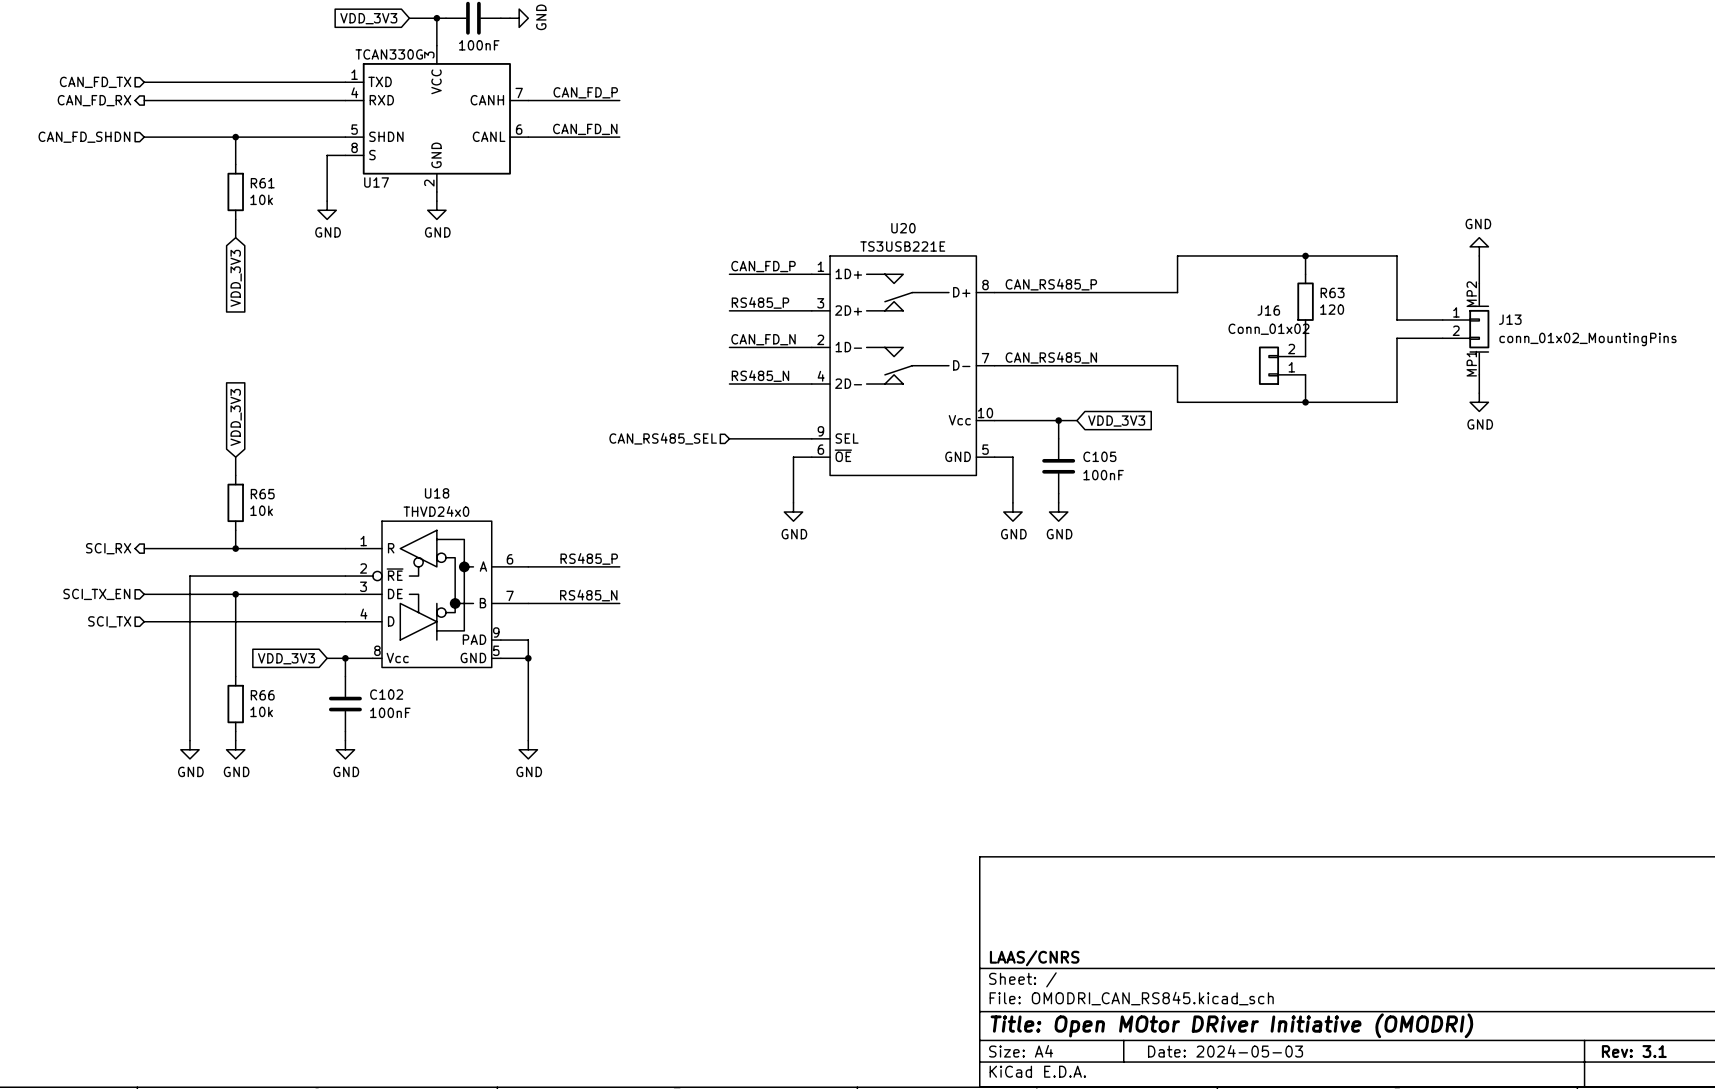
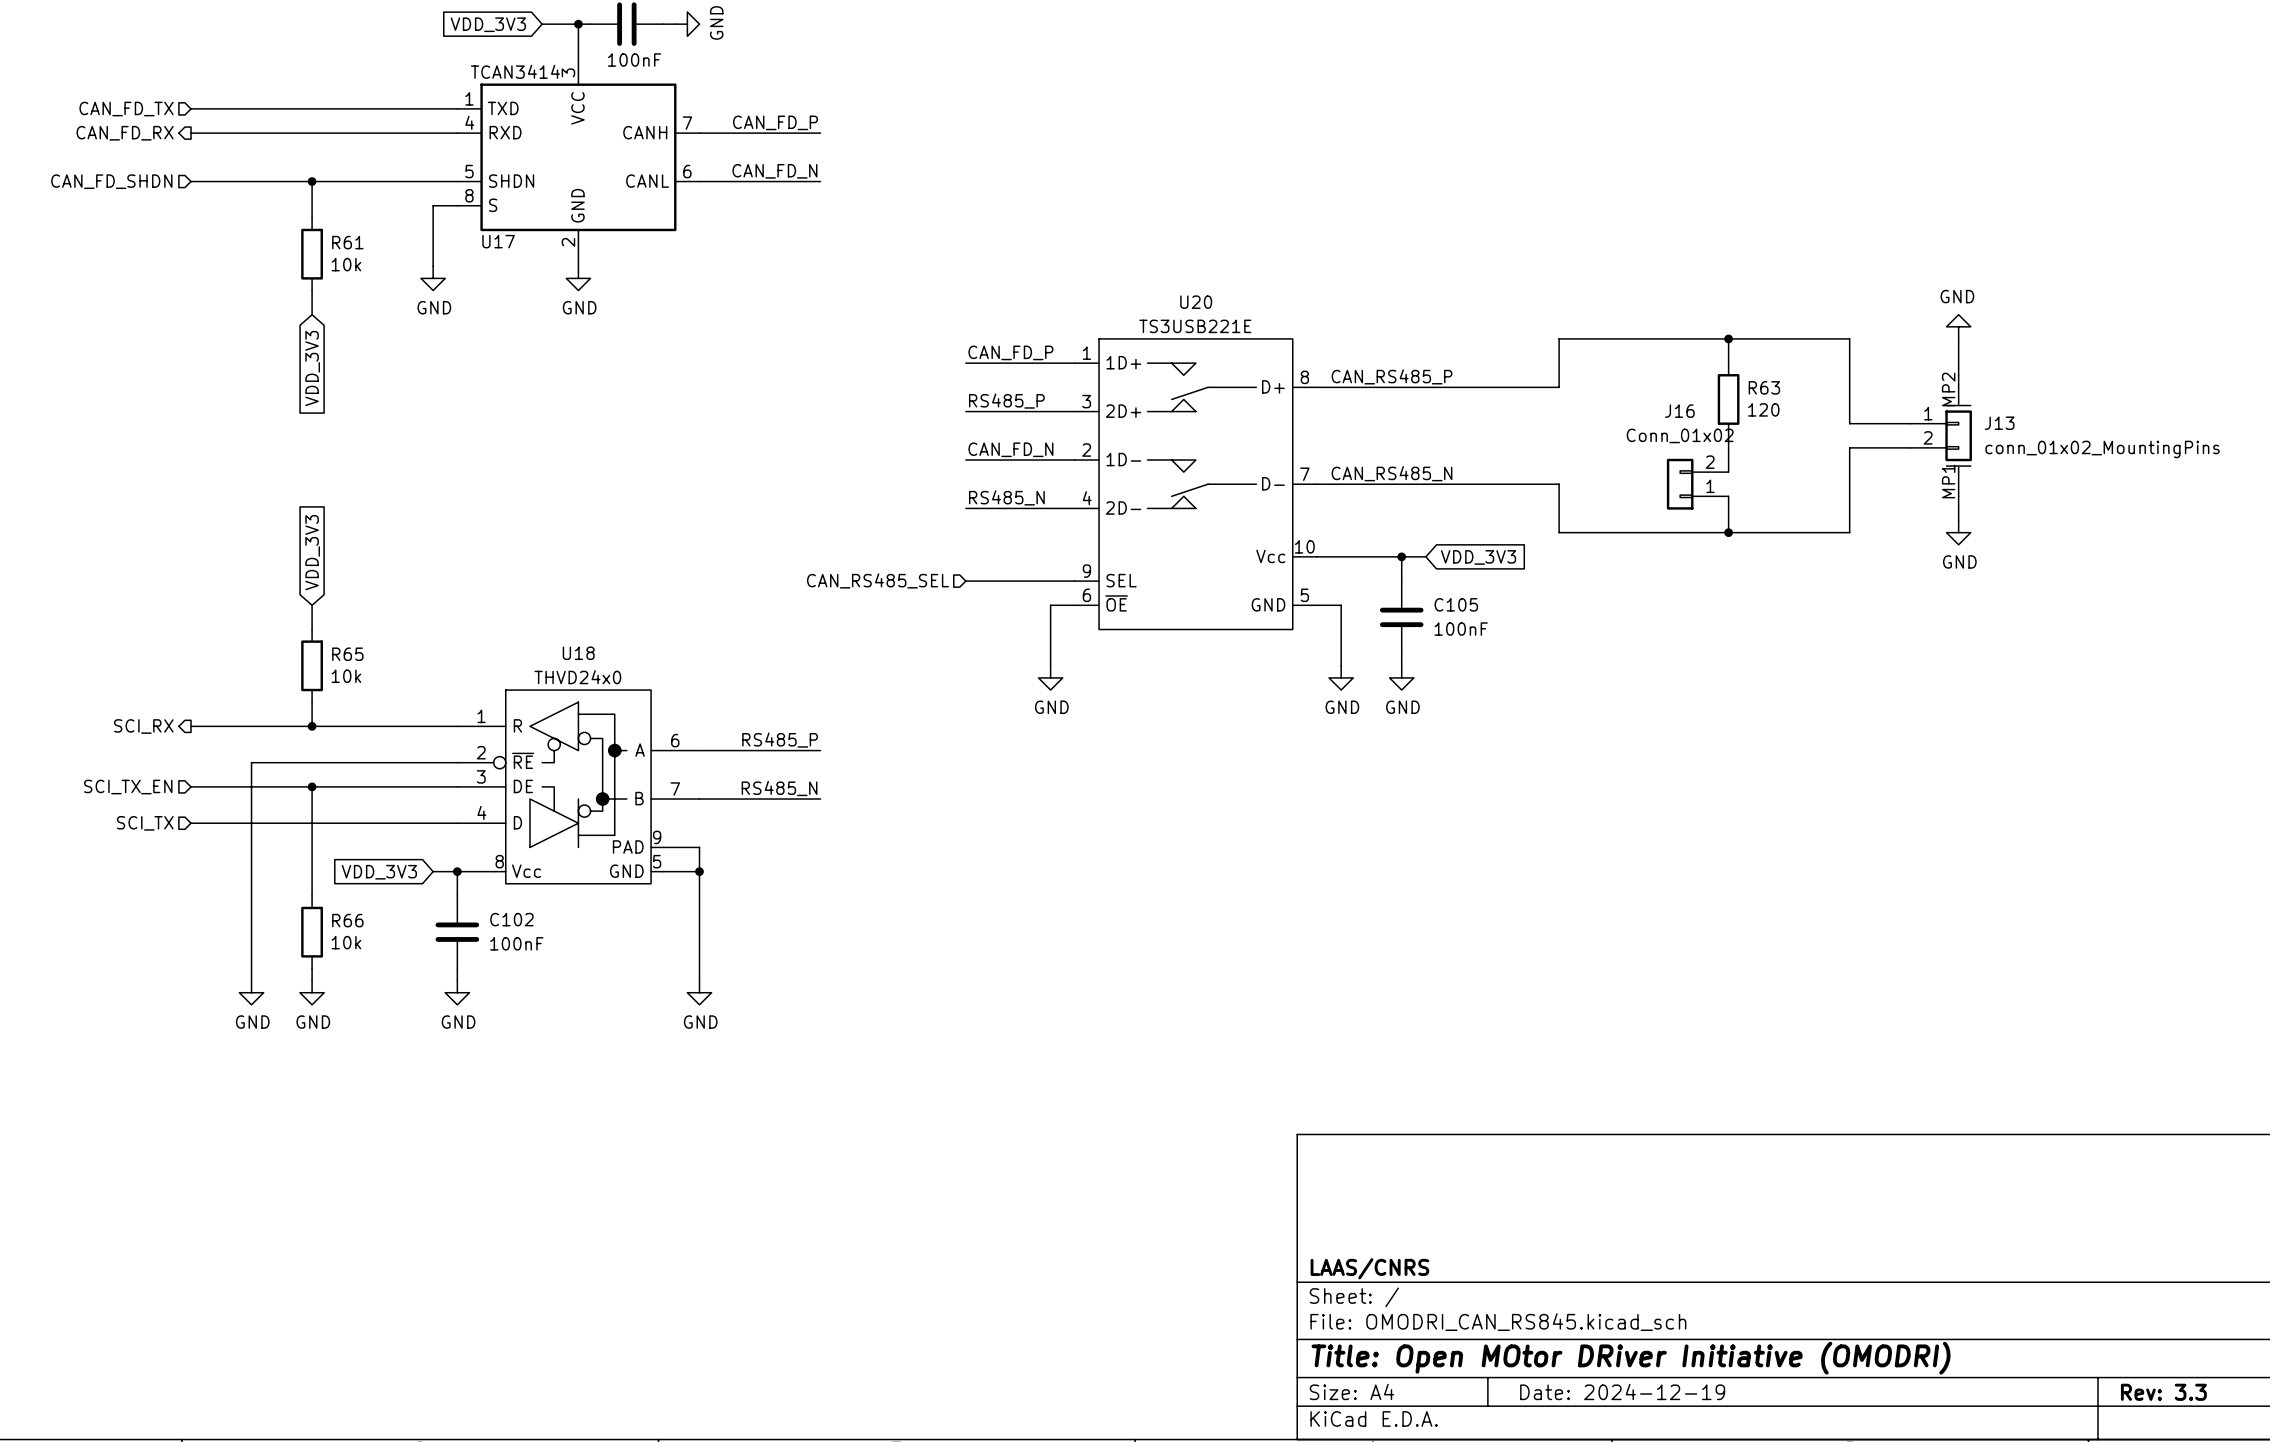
U17 value: TCAN330G (389, 54) -> TCAN3414 (515, 71)
title block: Date: 2024-05-03 (1225, 1051) -> Date: 2024-12-19 (1622, 1391)
title block: Rev: 3.1 (1634, 1051) -> Rev: 3.3 (2163, 1392)

